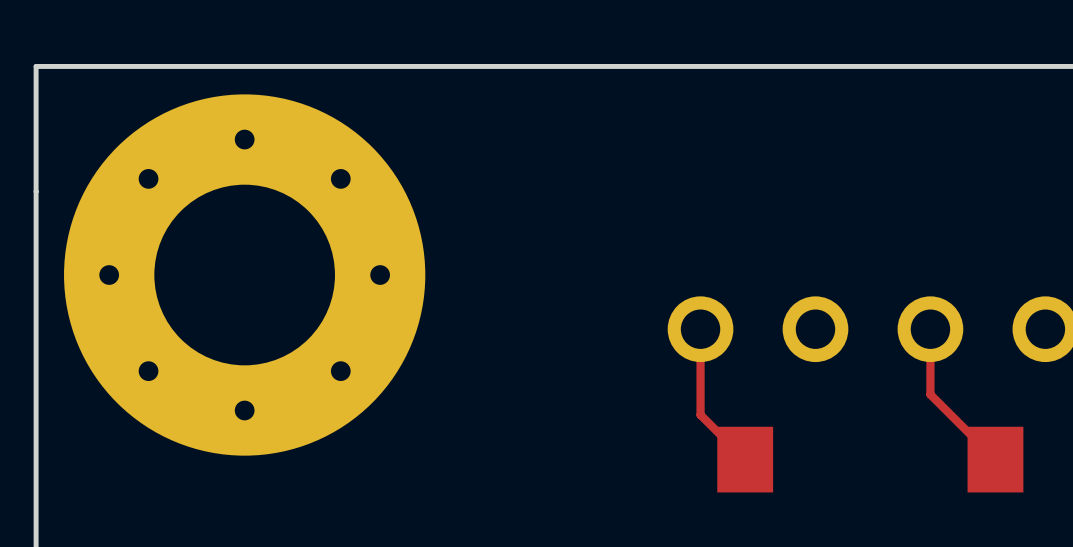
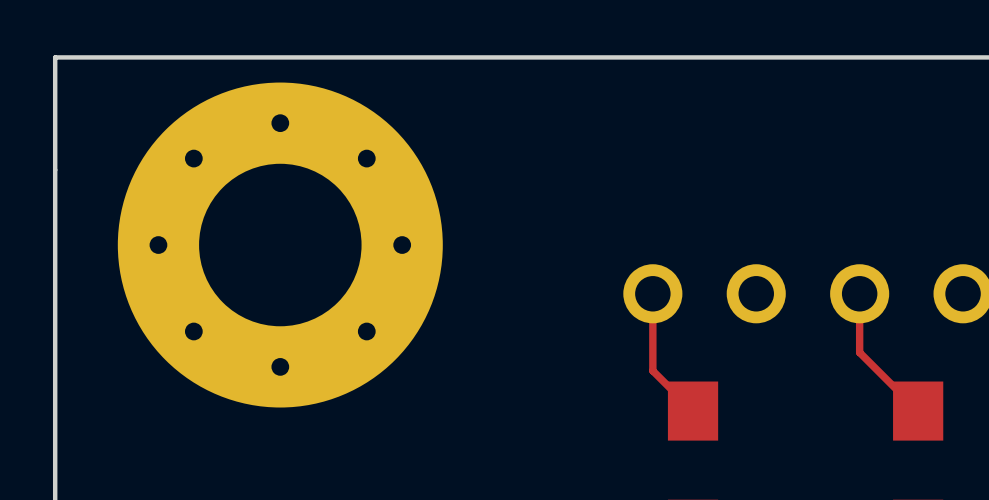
part position: (244, 275) -> (280, 245)

